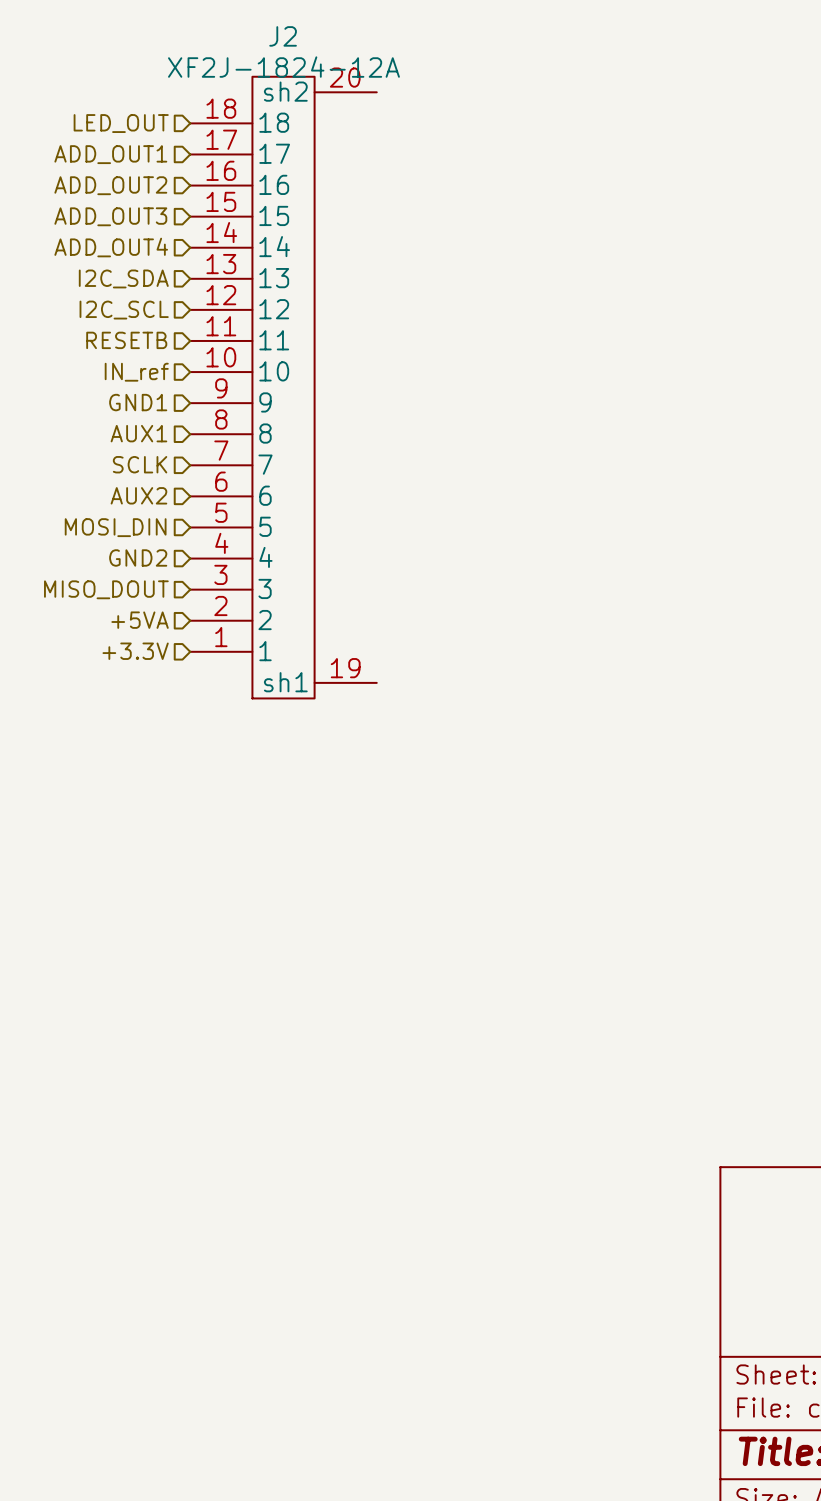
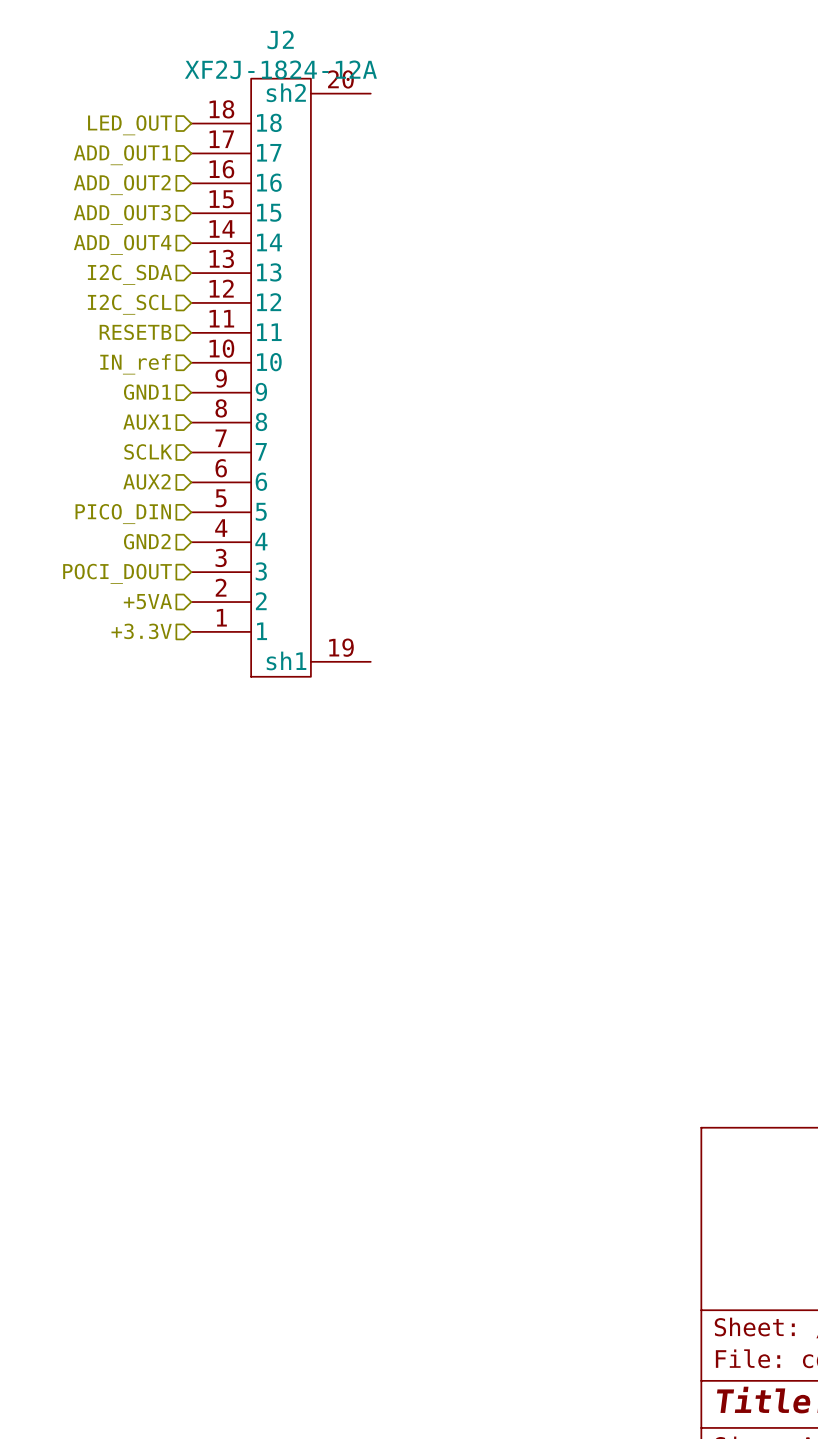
hierarchical label: MOSI_DIN (115, 527) -> PICO_DIN (123, 514)
hierarchical label: MISO_DOUT (106, 589) -> POCI_DOUT (117, 573)

